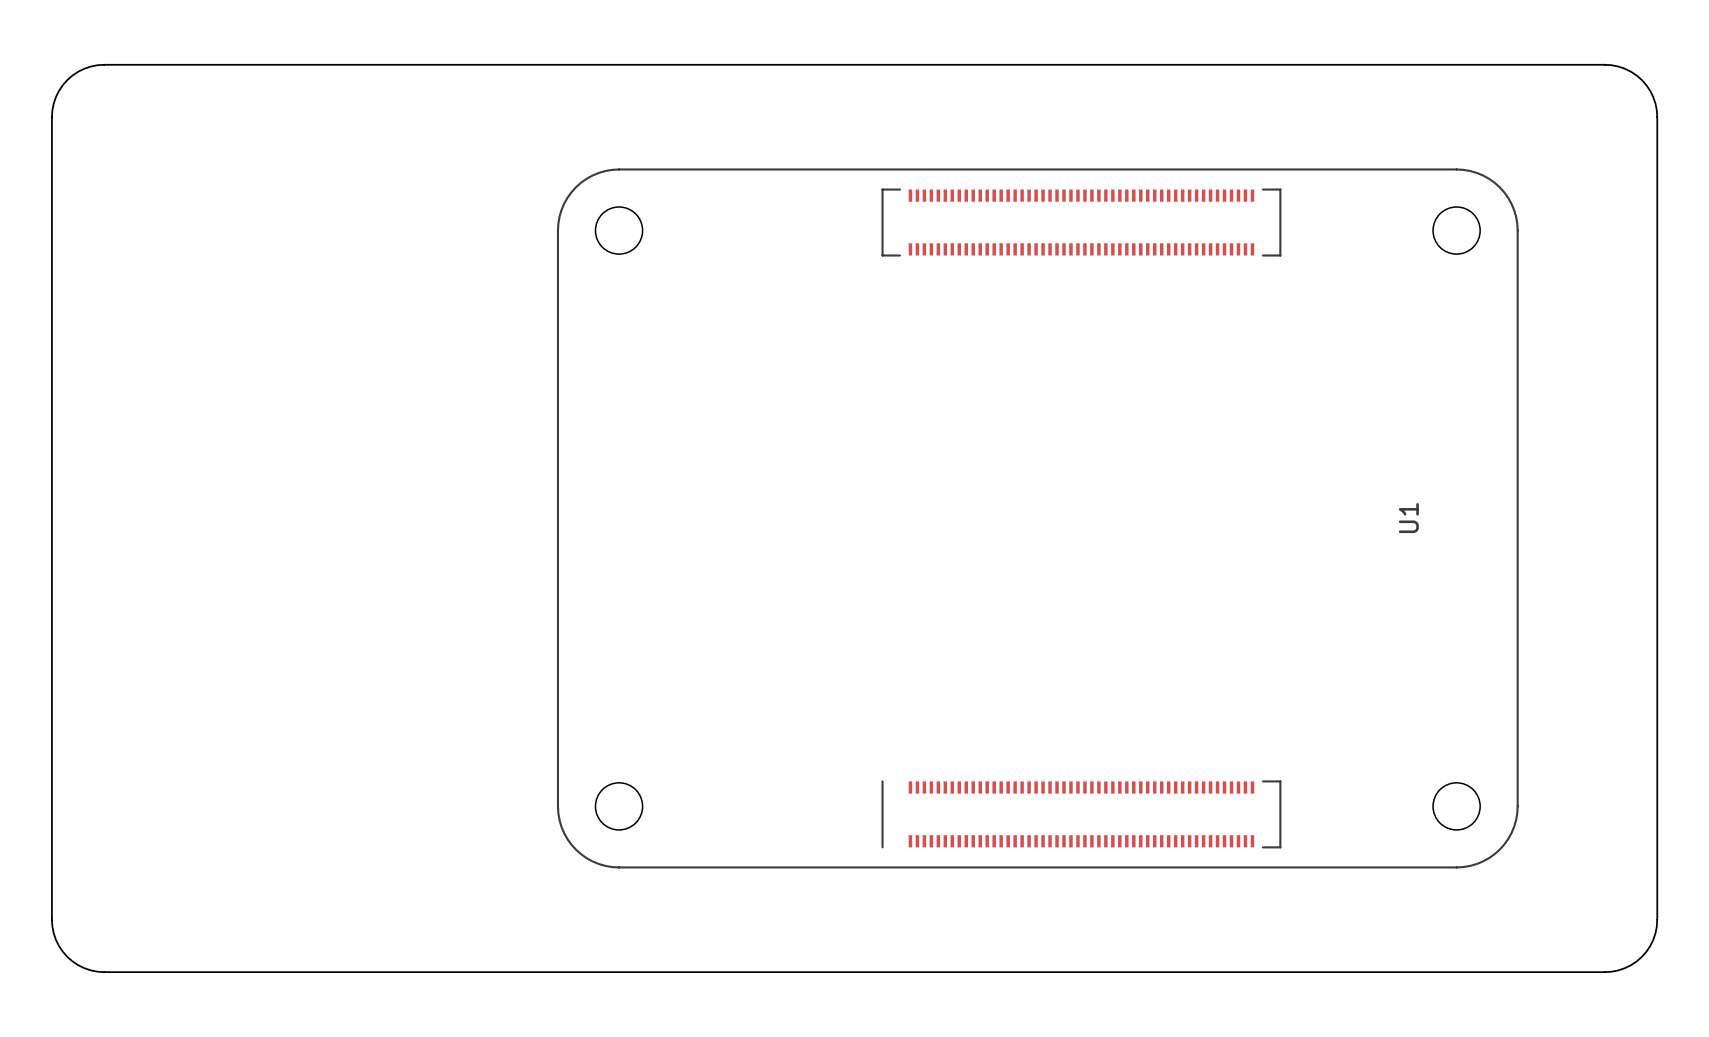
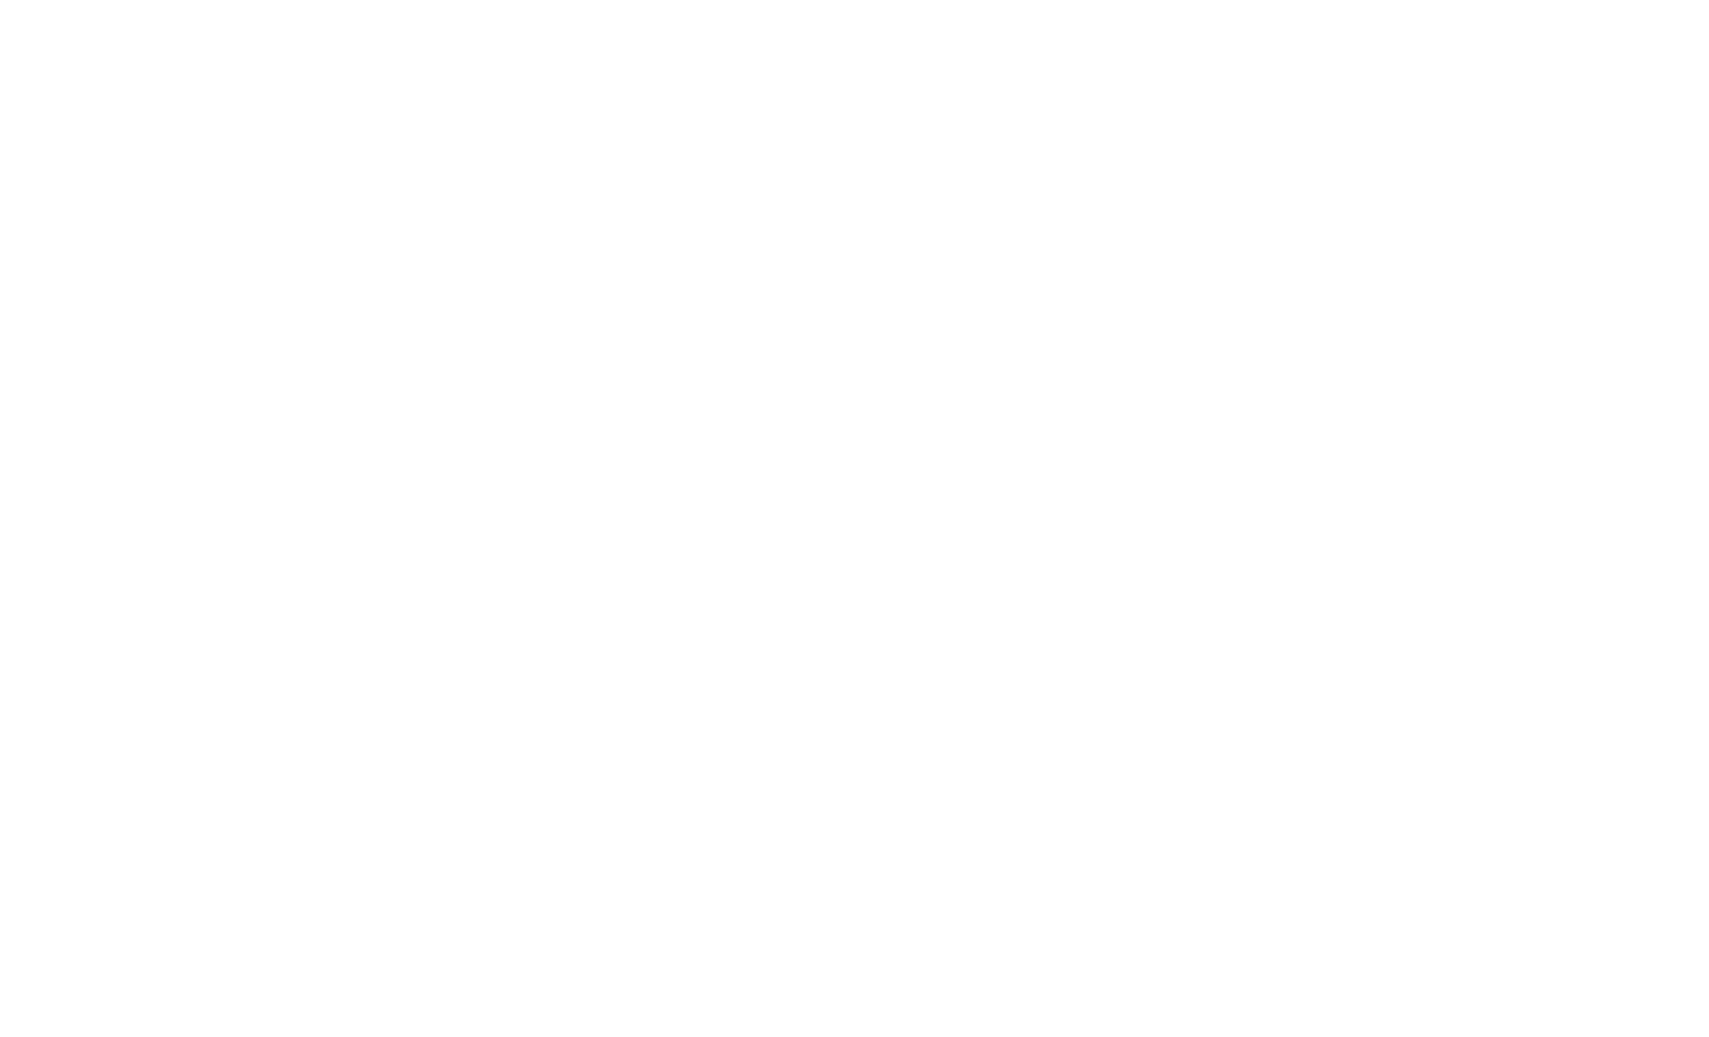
board edge: (104, 64) (1604, 64) (1618, 66) (1631, 71) (1641, 80) (1650, 90) (1655, 103) (1657, 117) (1657, 919) (1655, 933) (1650, 945) (1641, 956) (1631, 965) (1618, 970) (1604, 972) (104, 972) (90, 970) (78, 965) (67, 956) (58, 945) (53, 933) (51, 919) (51, 117) (55, 97) (67, 80) (84, 68) (104, 64) -> none
U1: (1037, 518) -> none

